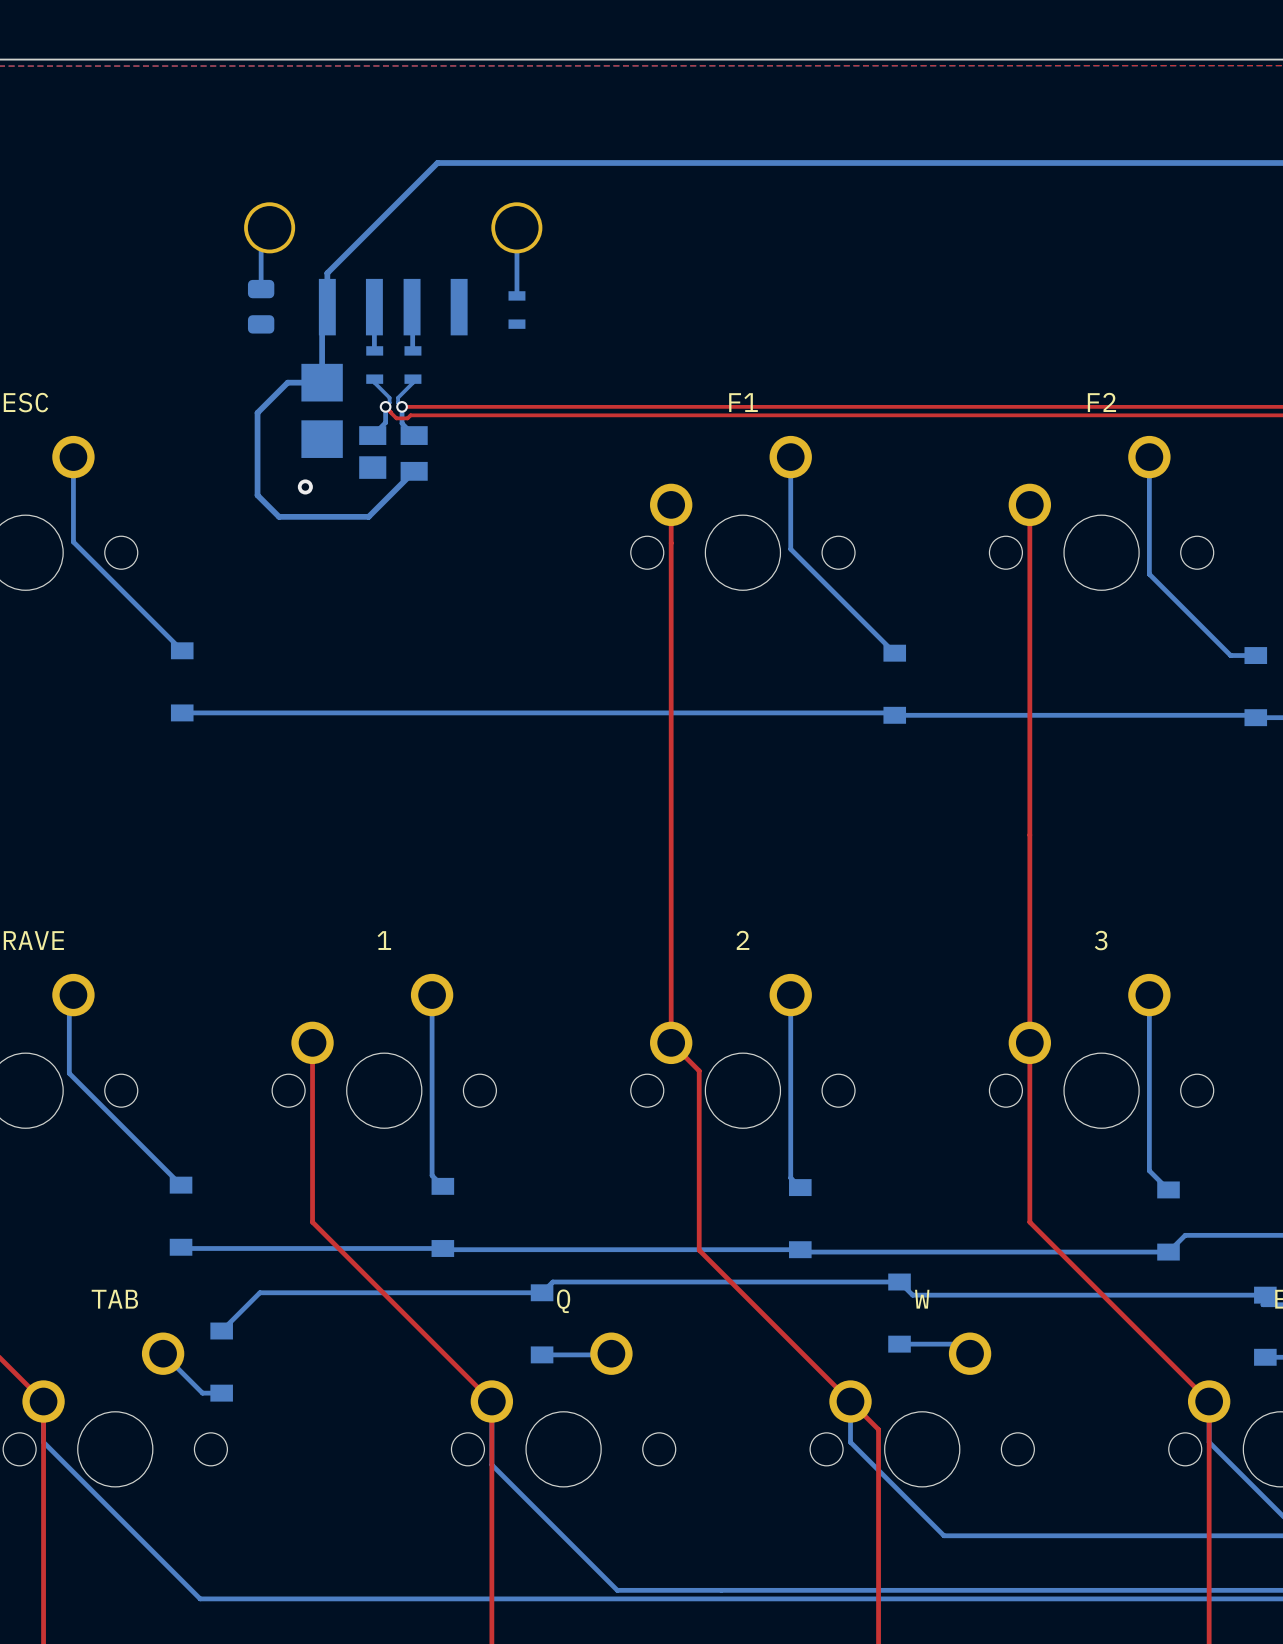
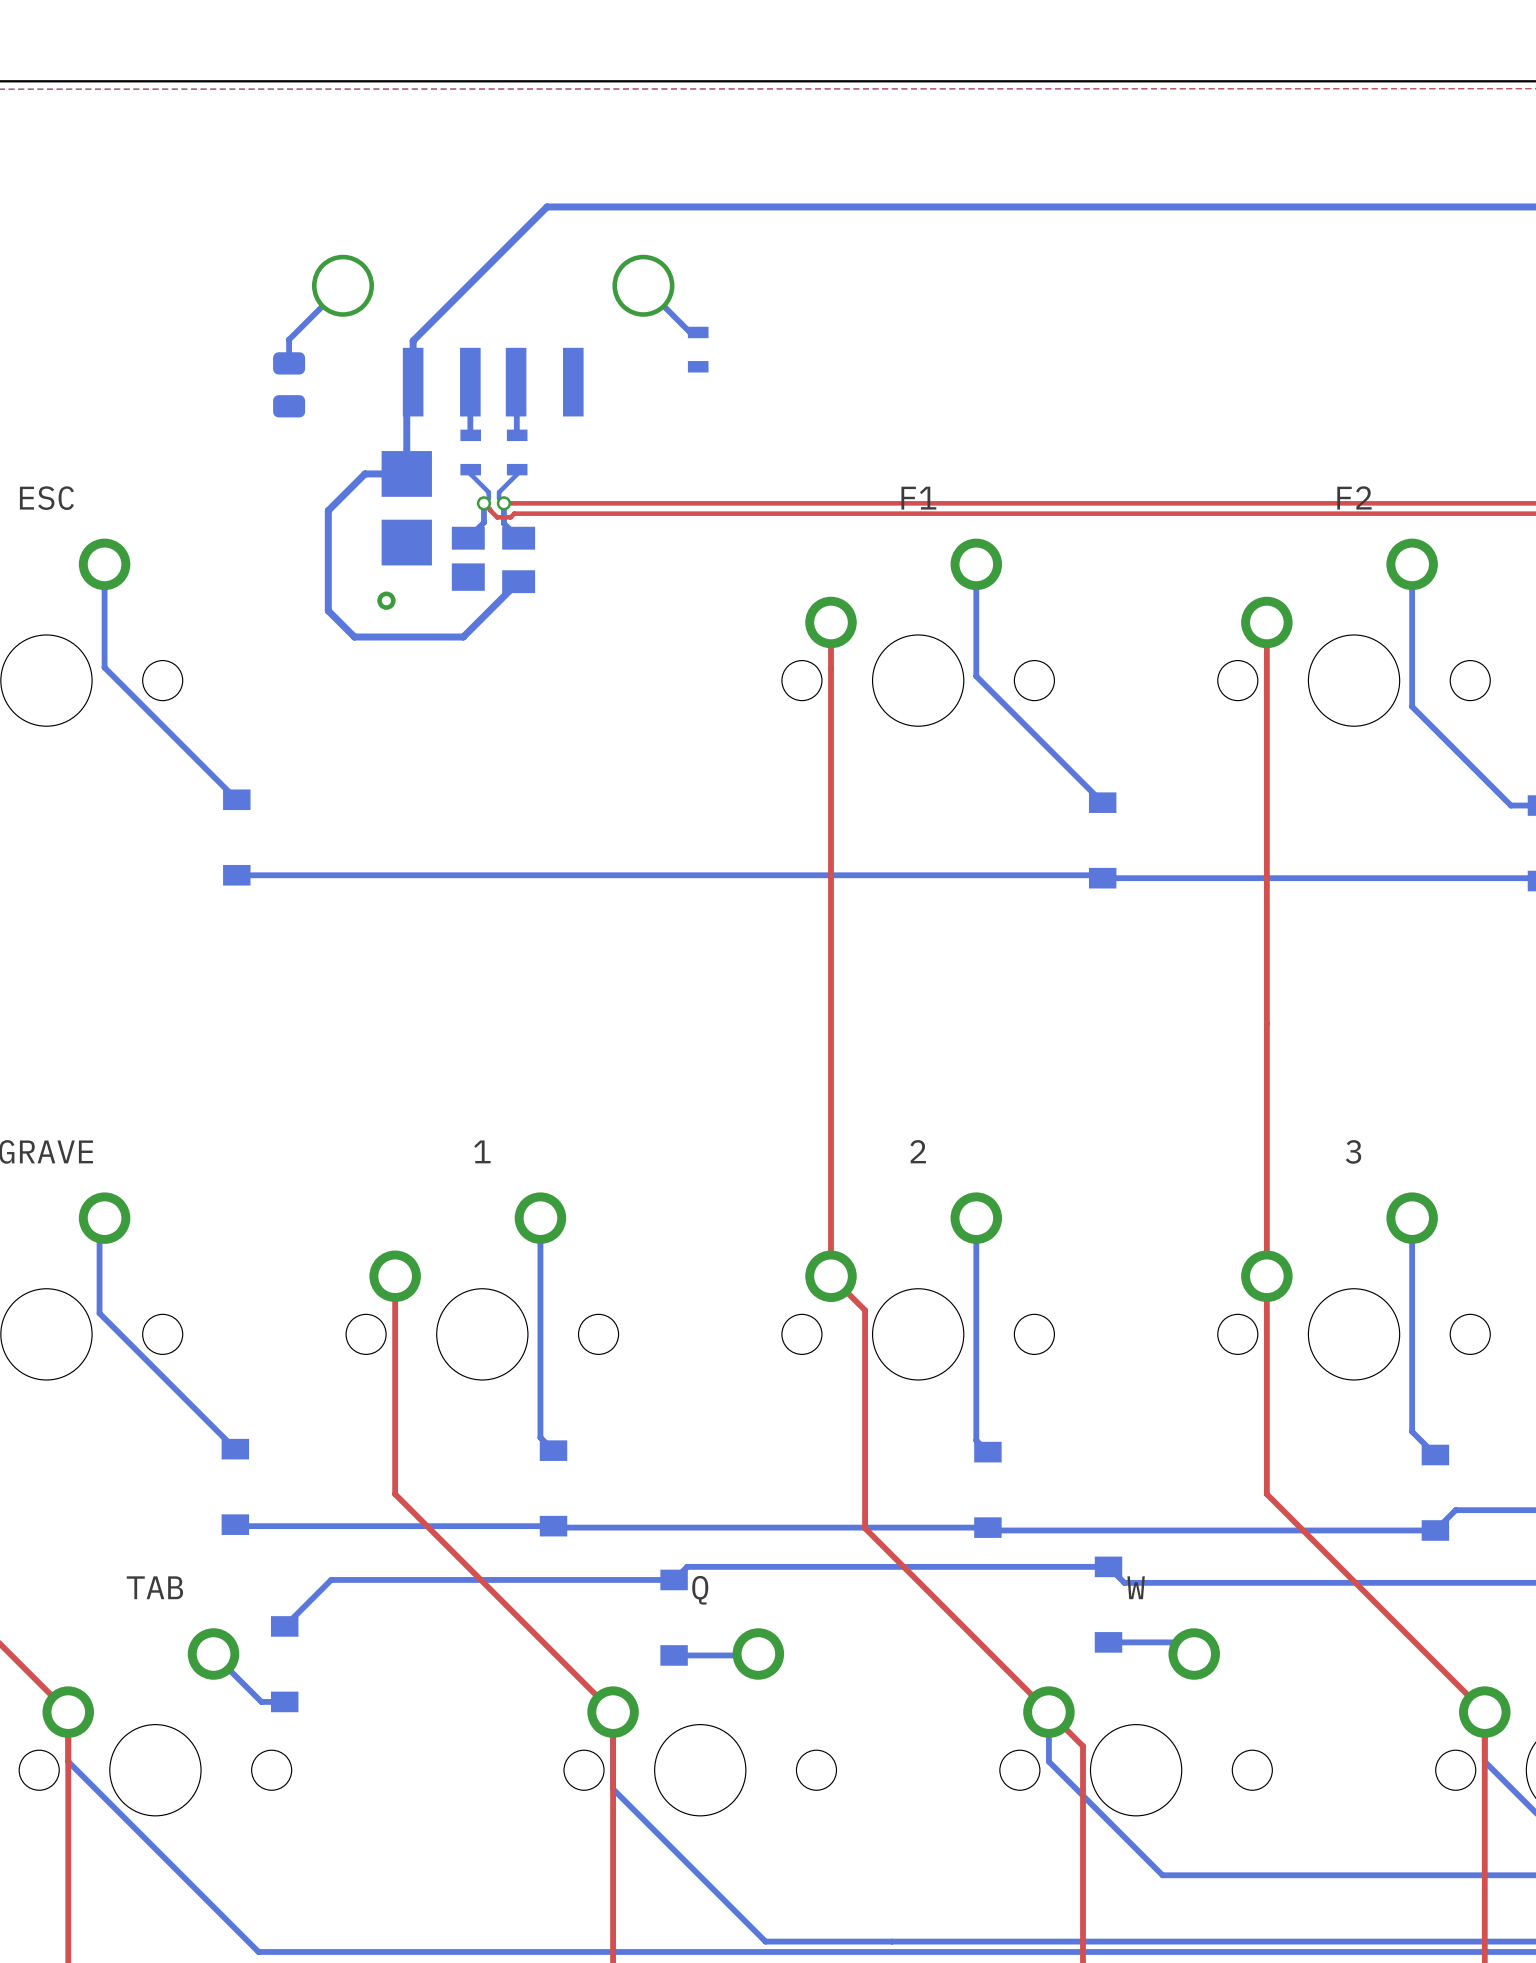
bottom track: (516, 227) (516, 295) -> (643, 285) (690, 332) (698, 332)
bottom track: (261, 236) (261, 289) -> (332, 296) (289, 339) (289, 363)
part position: (261, 306) -> (289, 384)
part position: (516, 310) -> (698, 349)

